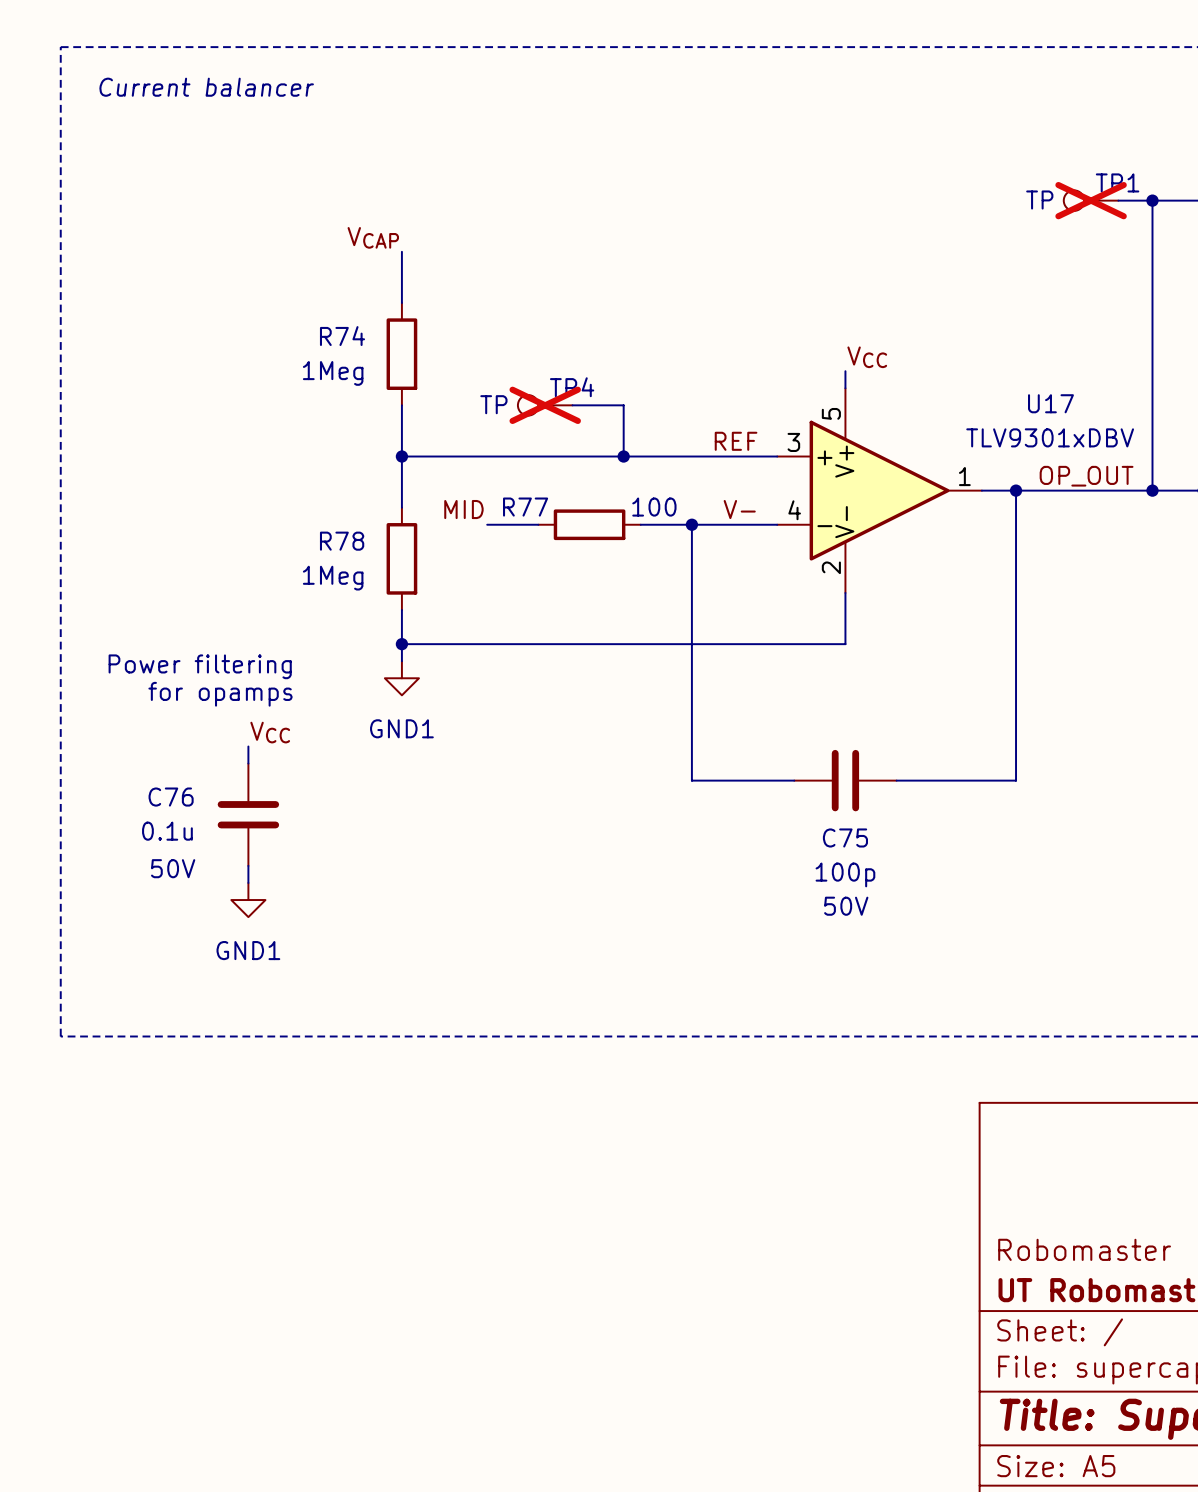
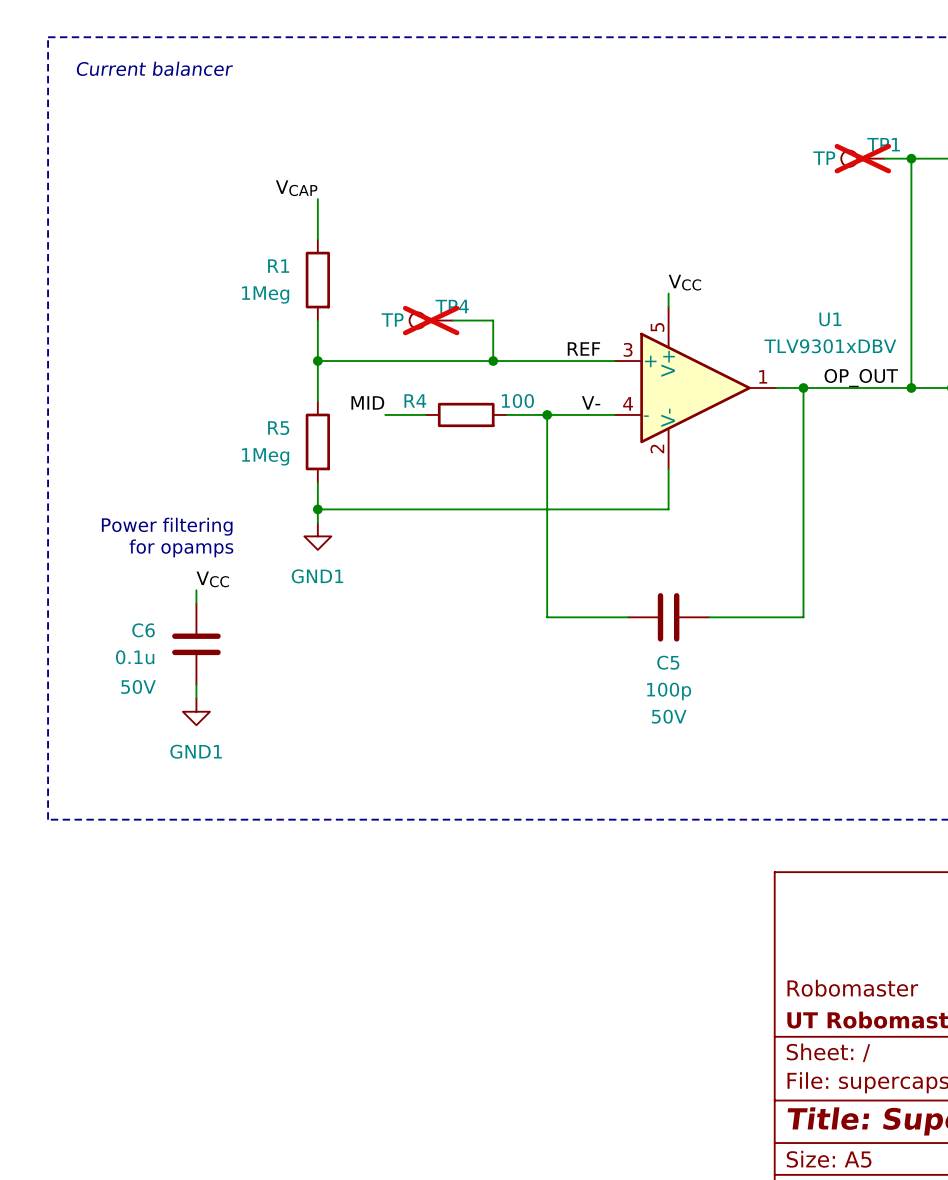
R74 name: R74 (342, 336) -> R1 (278, 266)
U17 name: U17 (1050, 403) -> U1 (830, 319)
R77 name: R77 (525, 507) -> R4 (415, 400)
R78 name: R78 (342, 541) -> R5 (278, 428)
C76 name: C76 (171, 797) -> C6 (143, 630)
C75 name: C75 (845, 837) -> C5 (668, 662)

